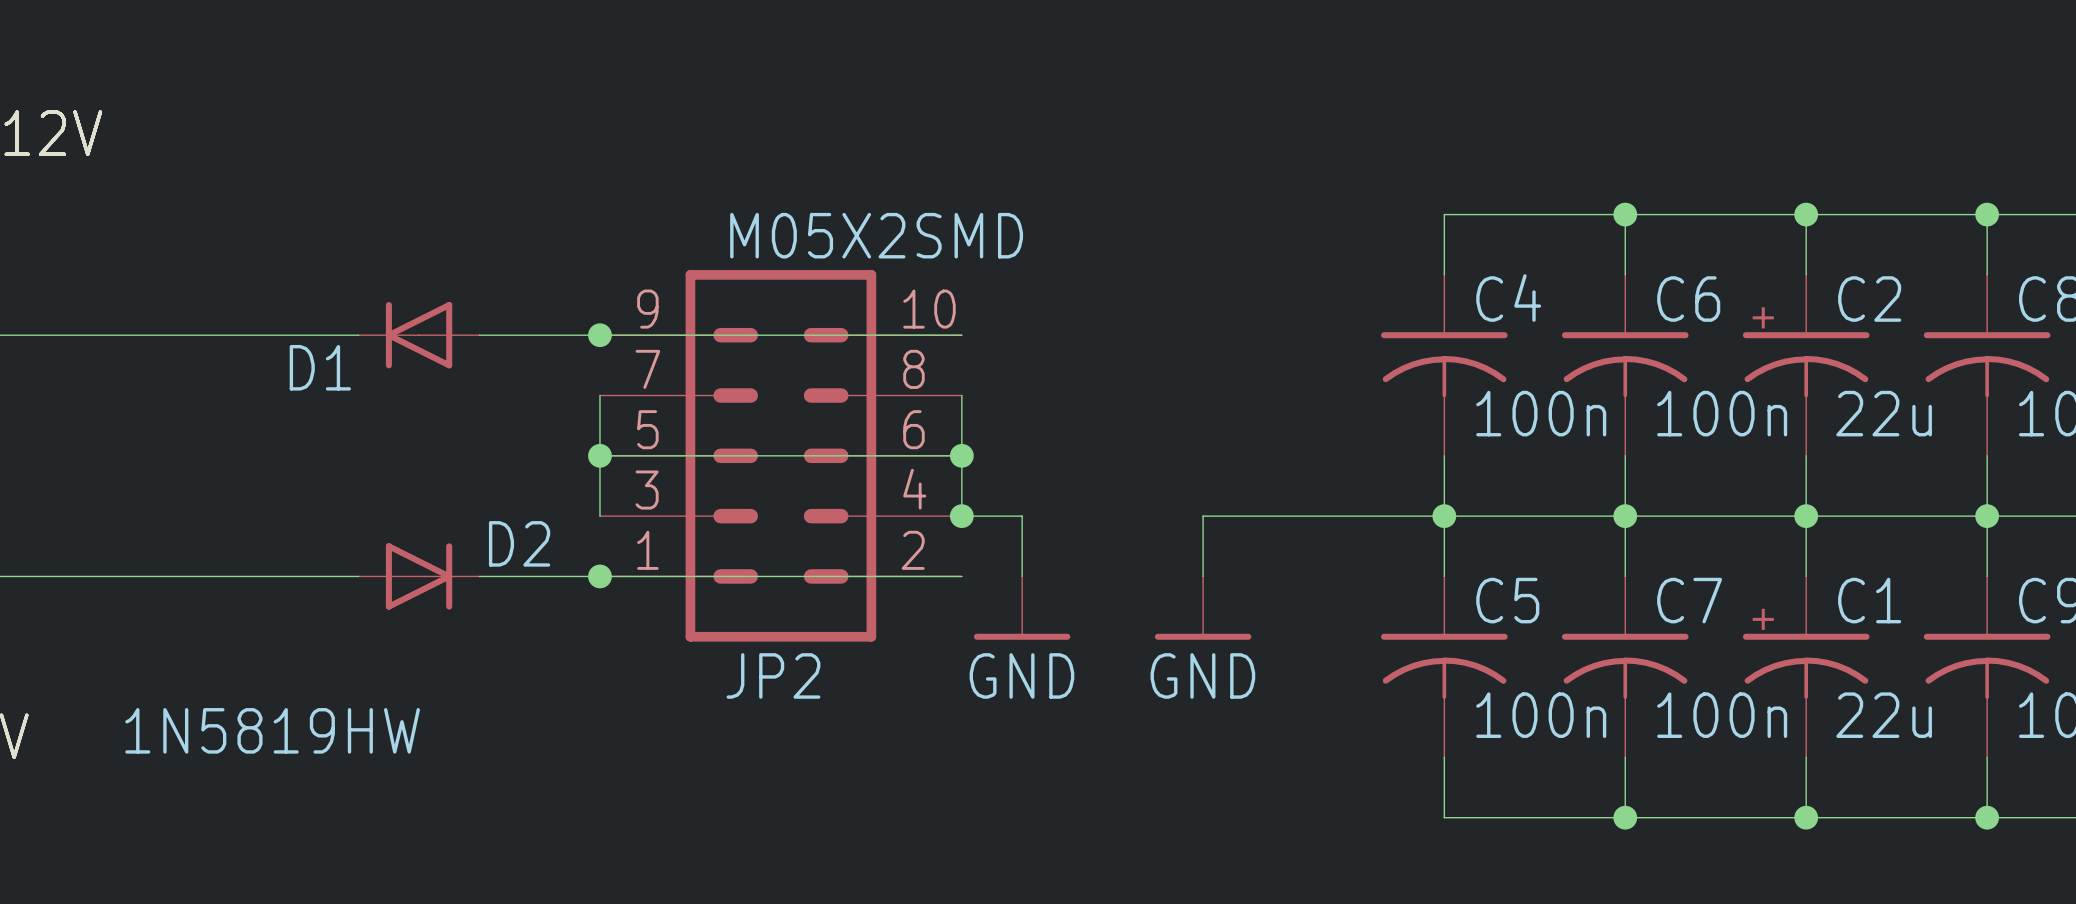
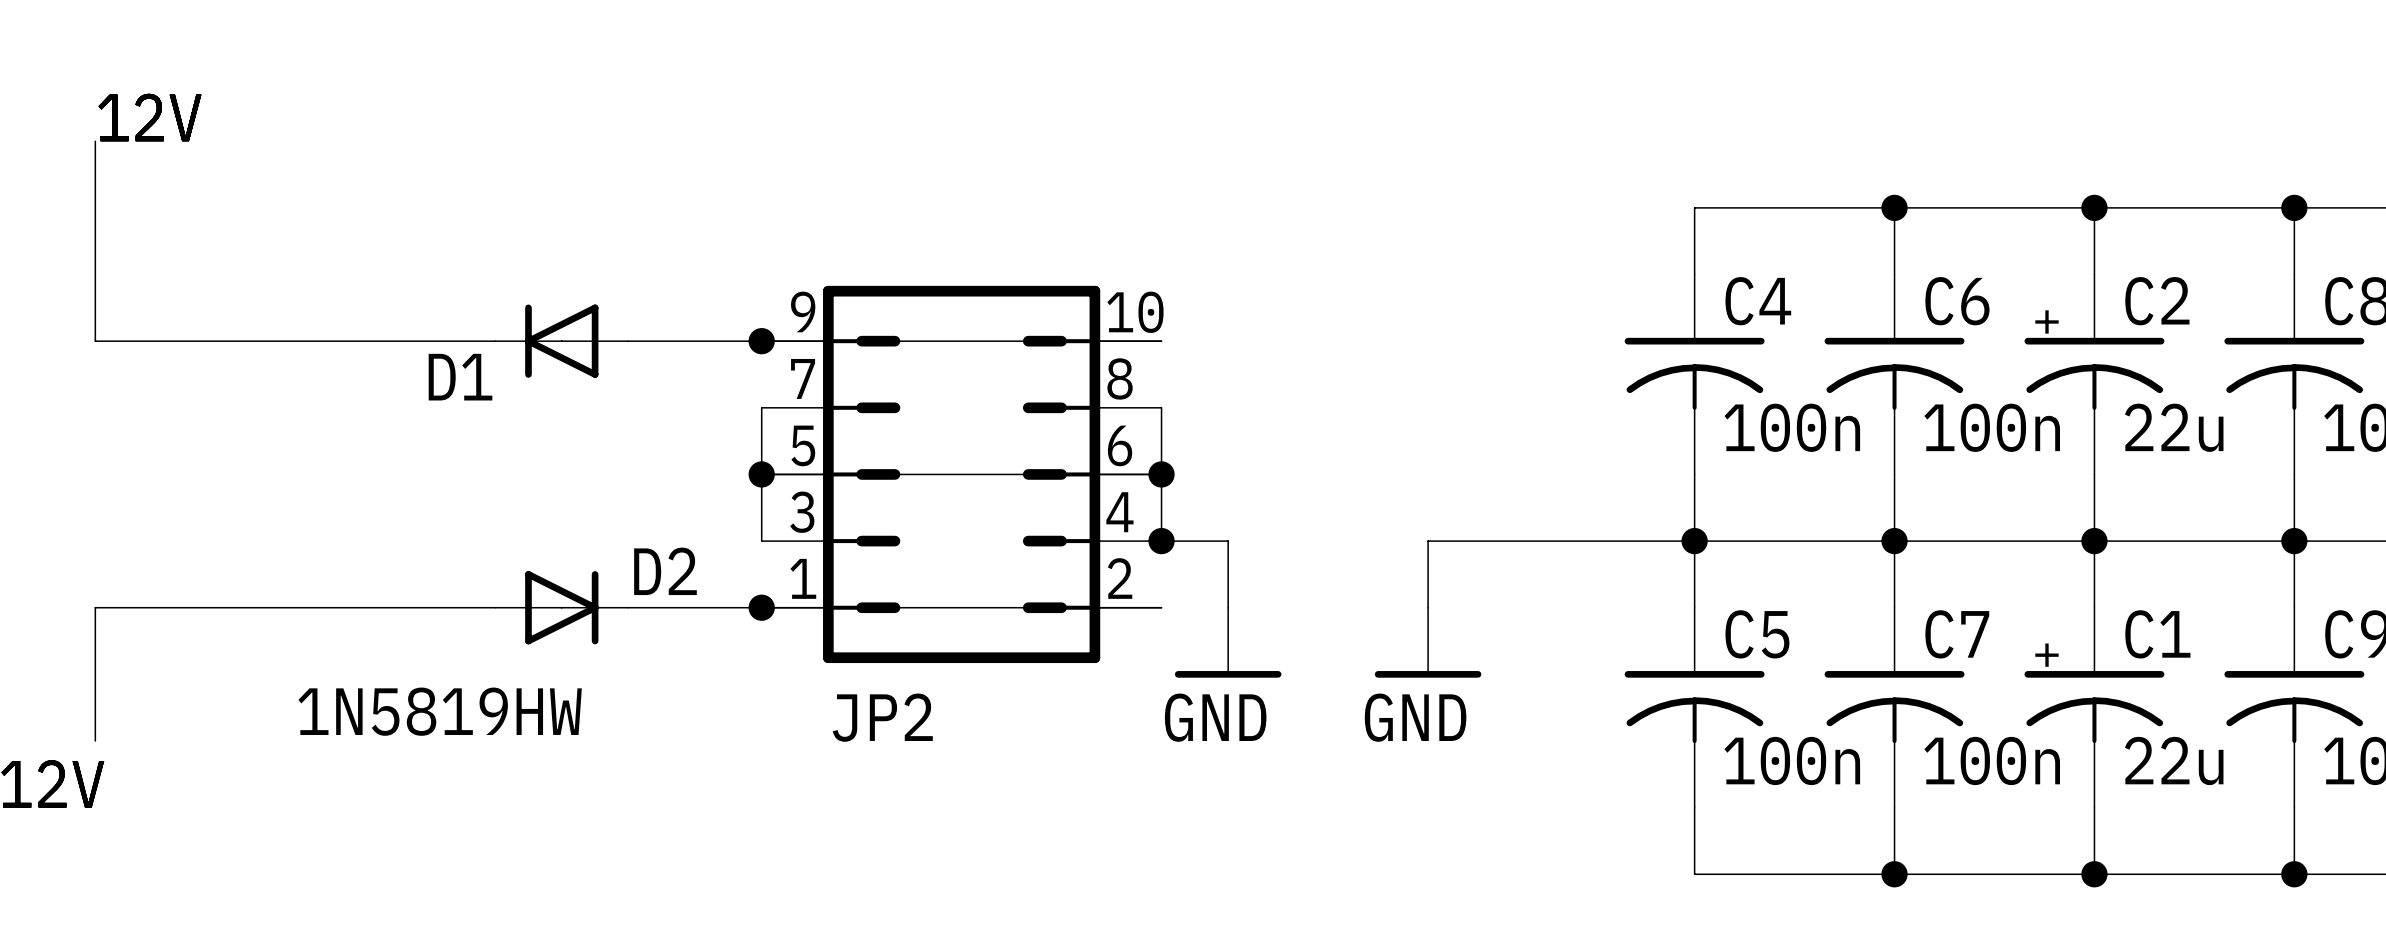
JP2 value: M05X2SMD (876, 235) -> none
JP2 symbol: [599, 270, 962, 642] -> [761, 285, 1162, 664]
JP2 name position: JP2 (773, 675) -> JP2 (882, 717)
D2 value position: 1N5819HW (272, 730) -> 1N5819HW (440, 711)

